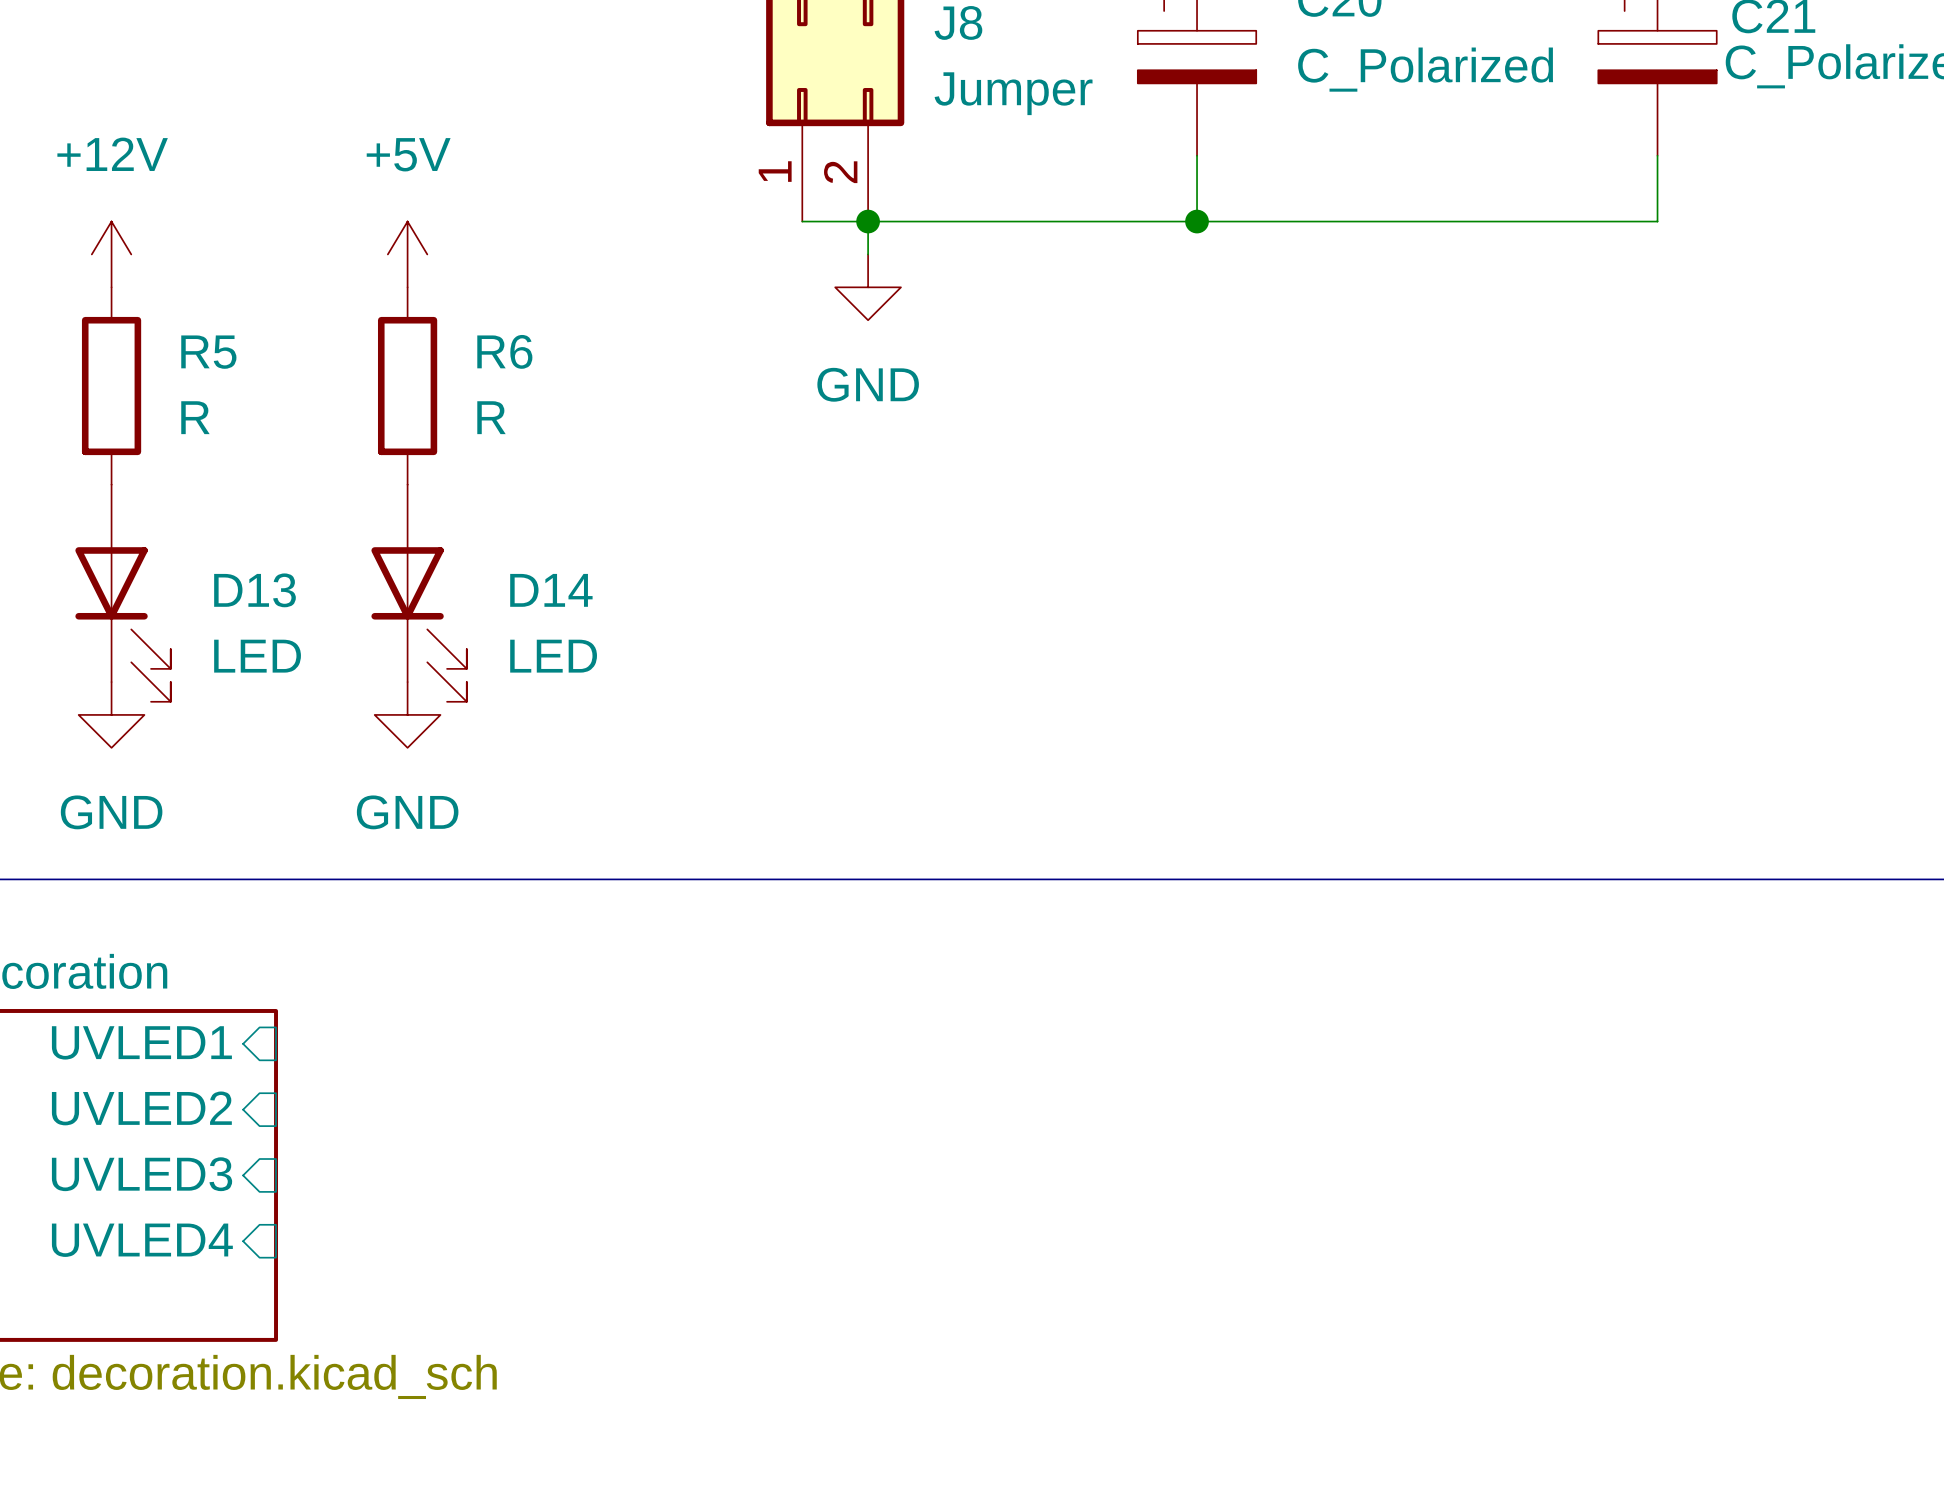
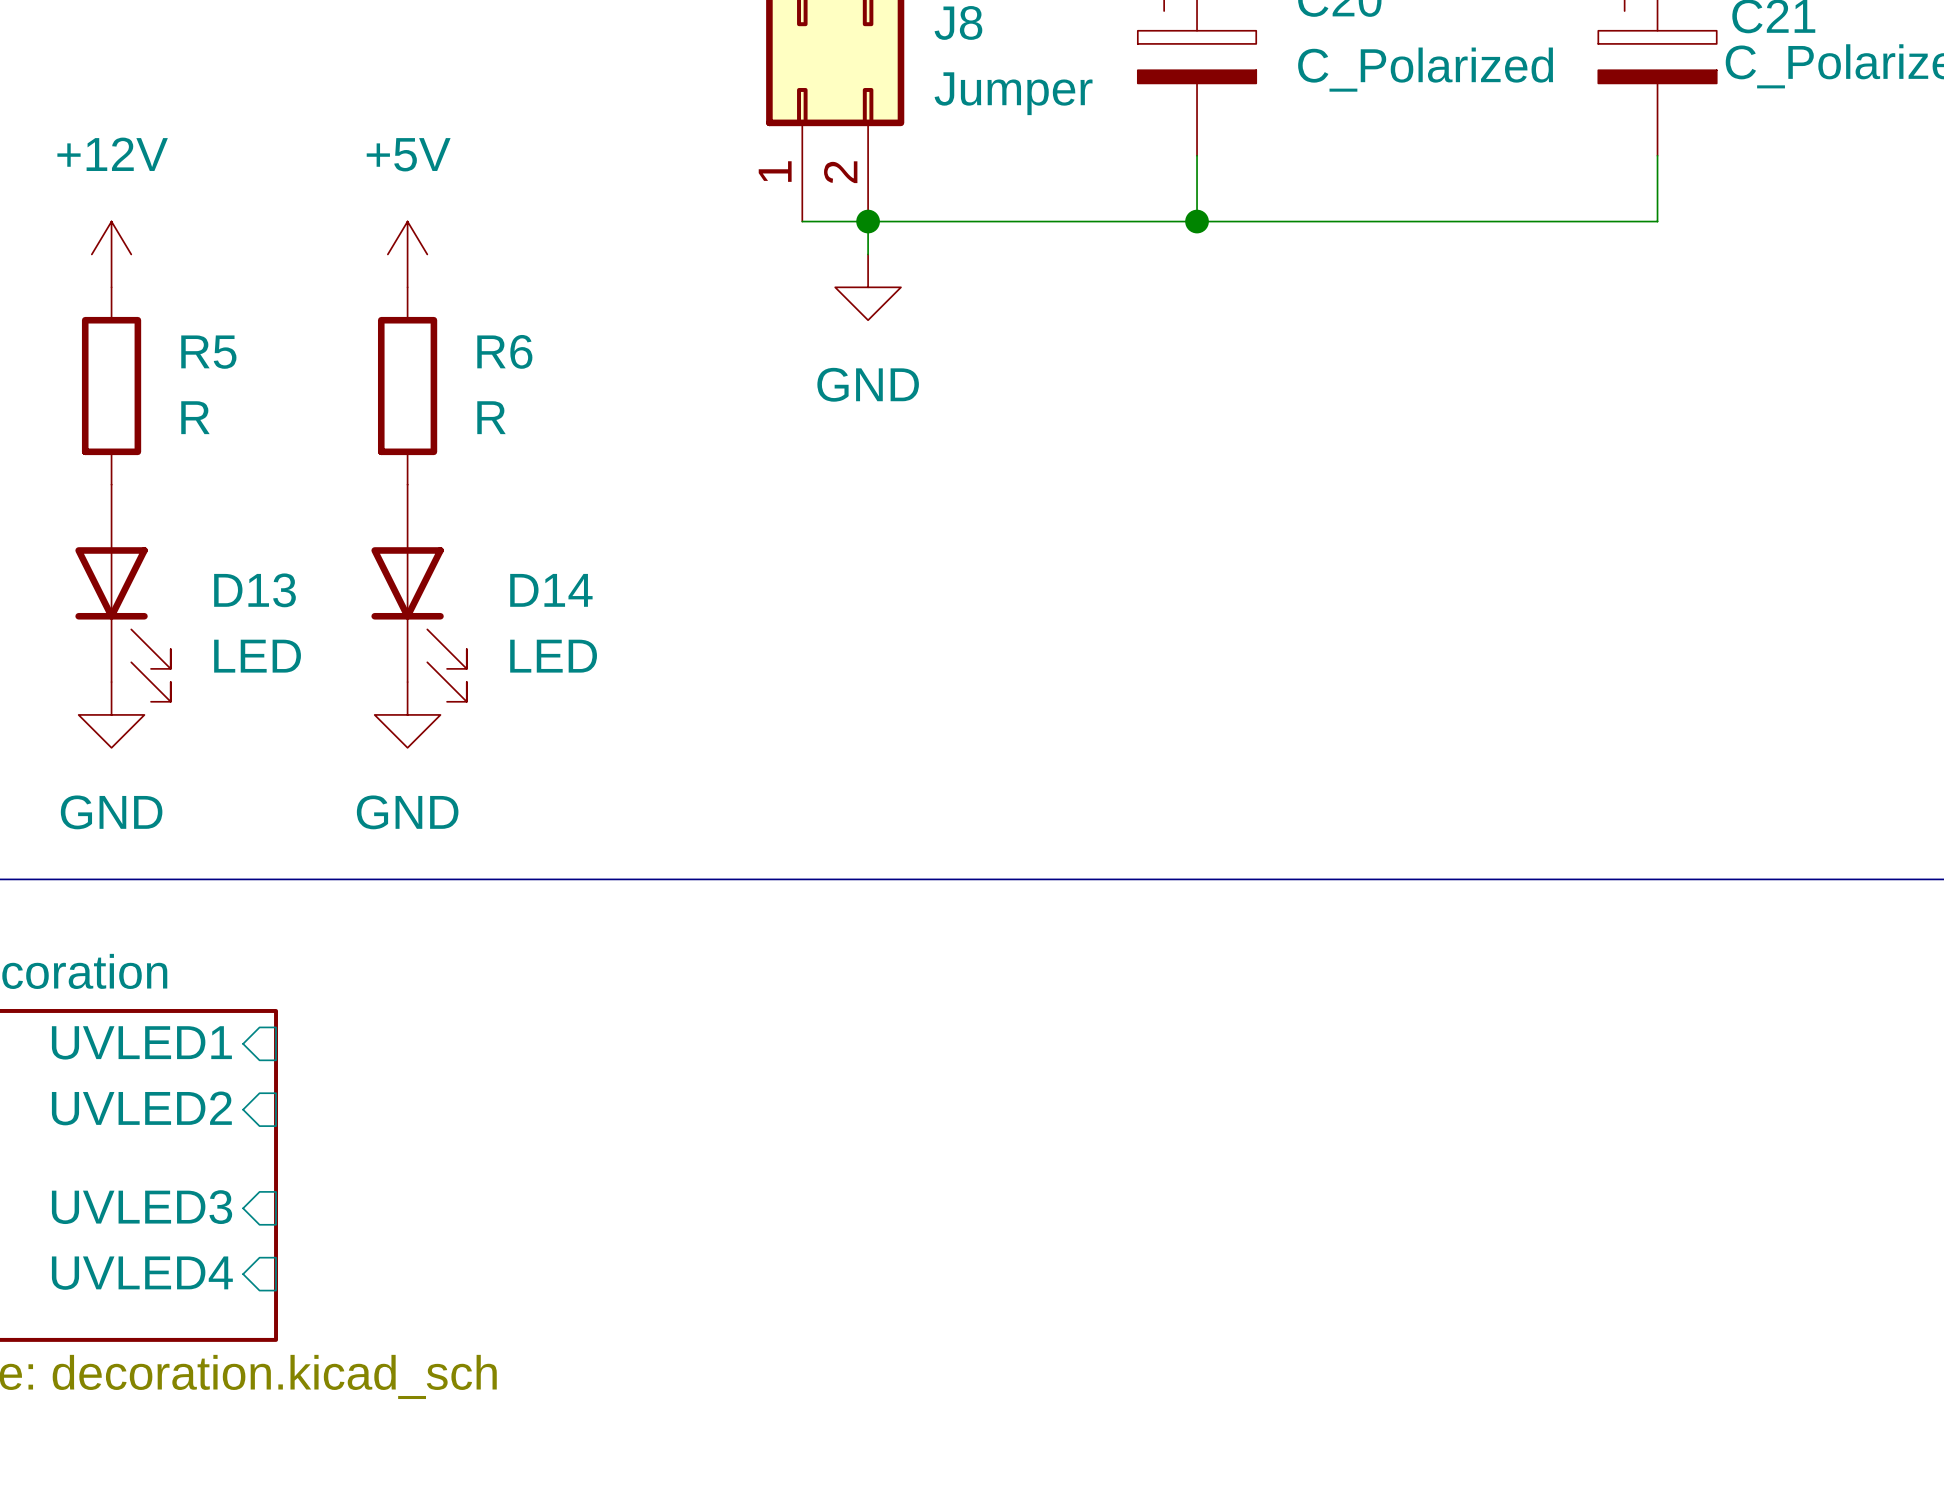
sheet pin position: UVLED3 (142, 1174) -> UVLED3 (142, 1207)
sheet pin position: UVLED4 (142, 1240) -> UVLED4 (142, 1273)

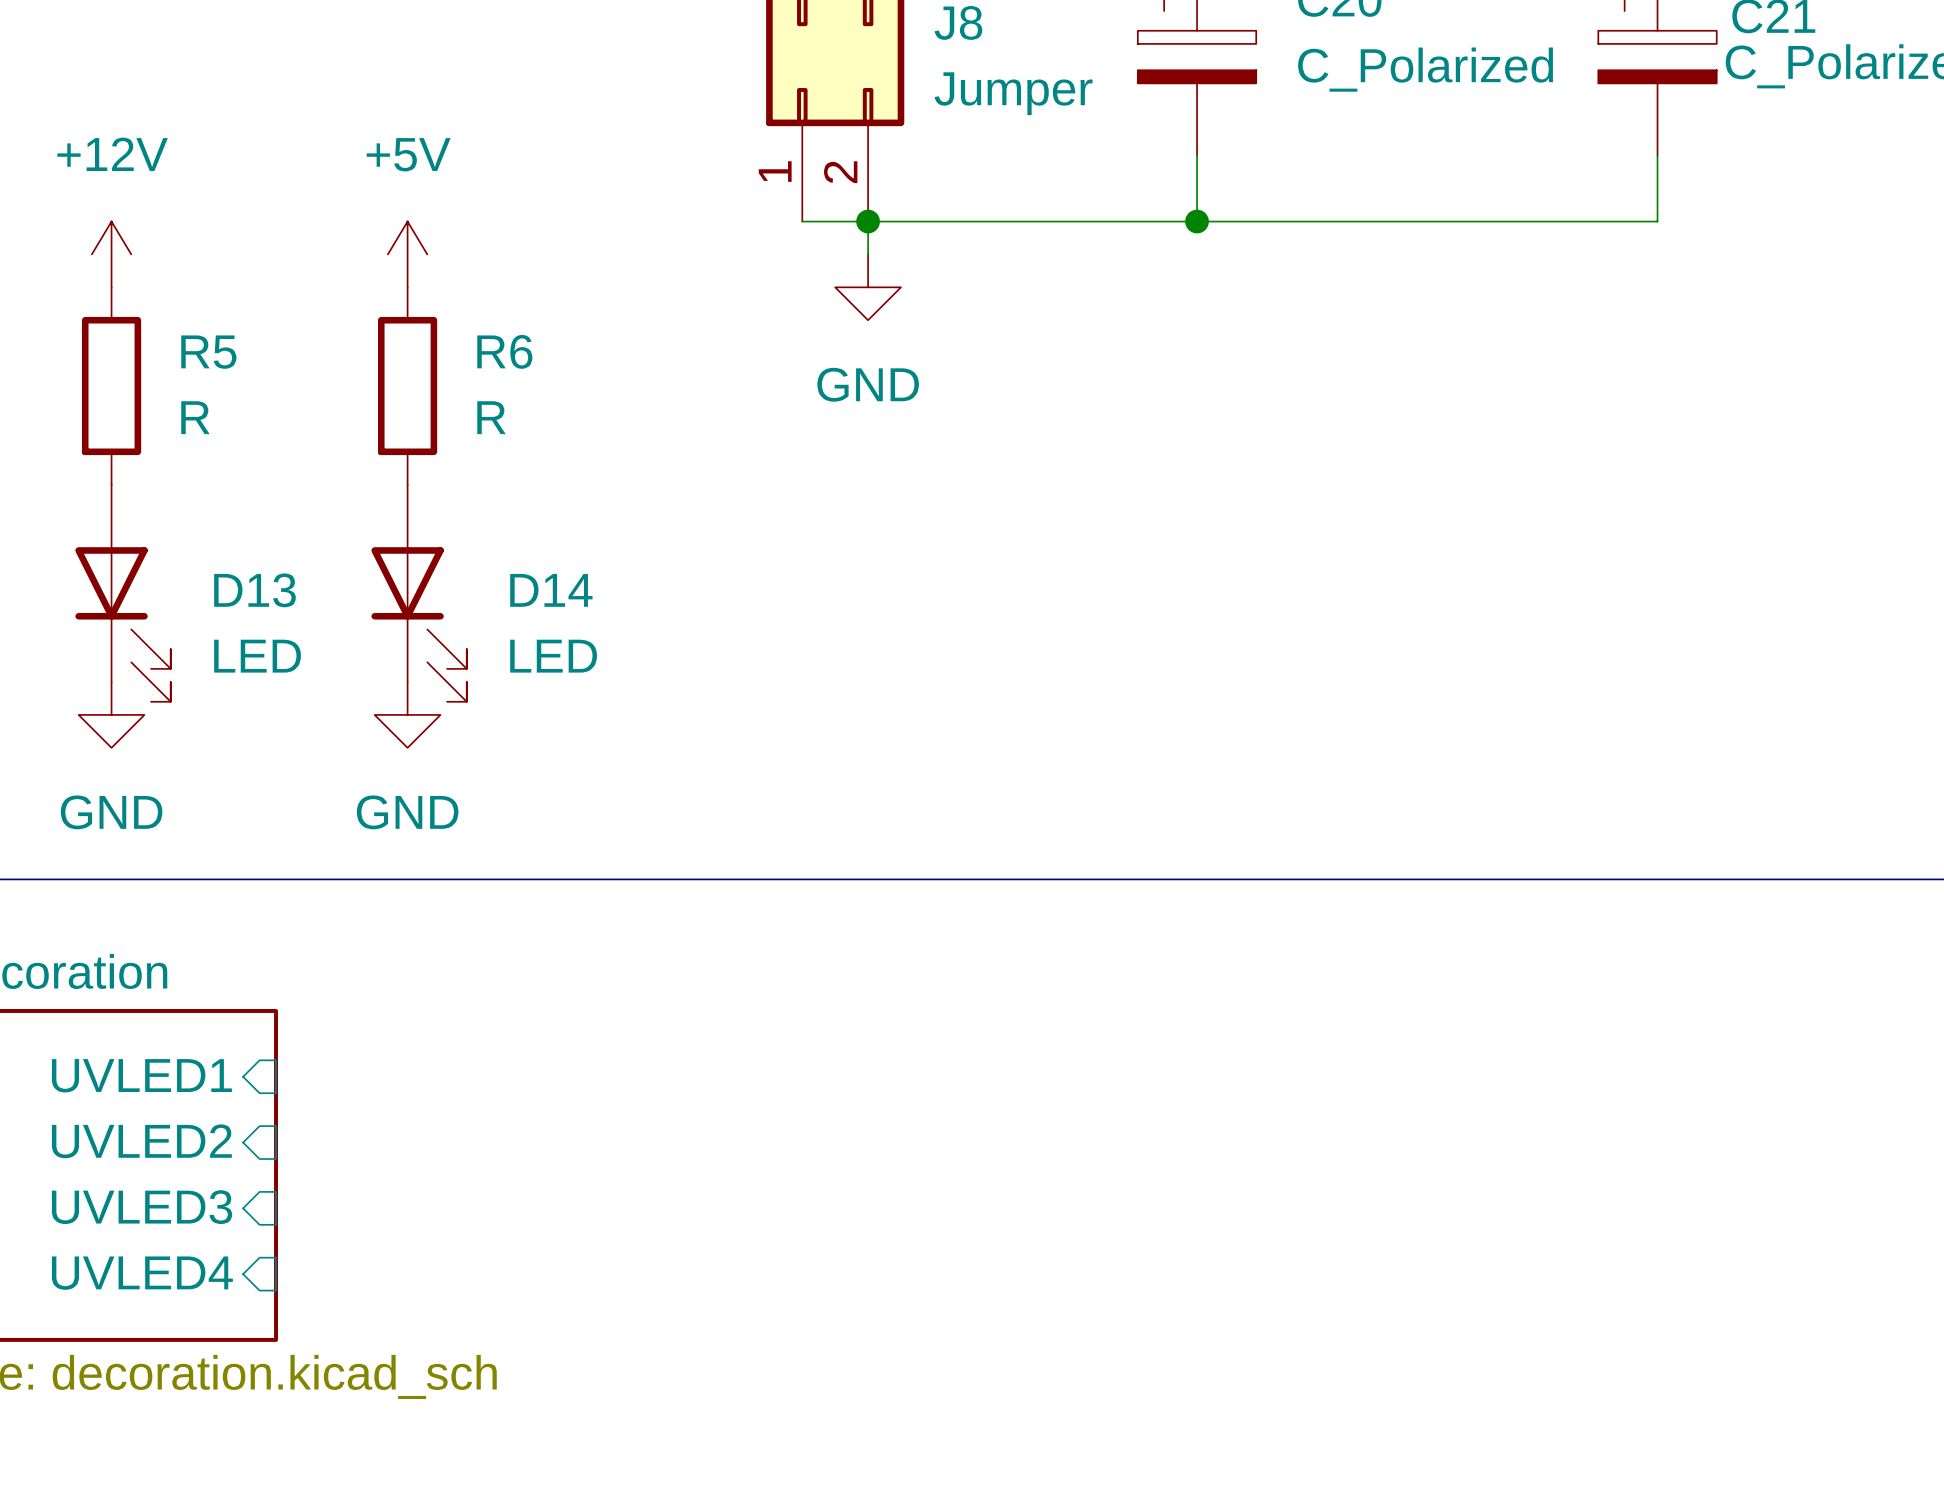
sheet pin position: UVLED1 (141, 1042) -> UVLED1 (141, 1075)
sheet pin position: UVLED2 (141, 1108) -> UVLED2 (141, 1141)

